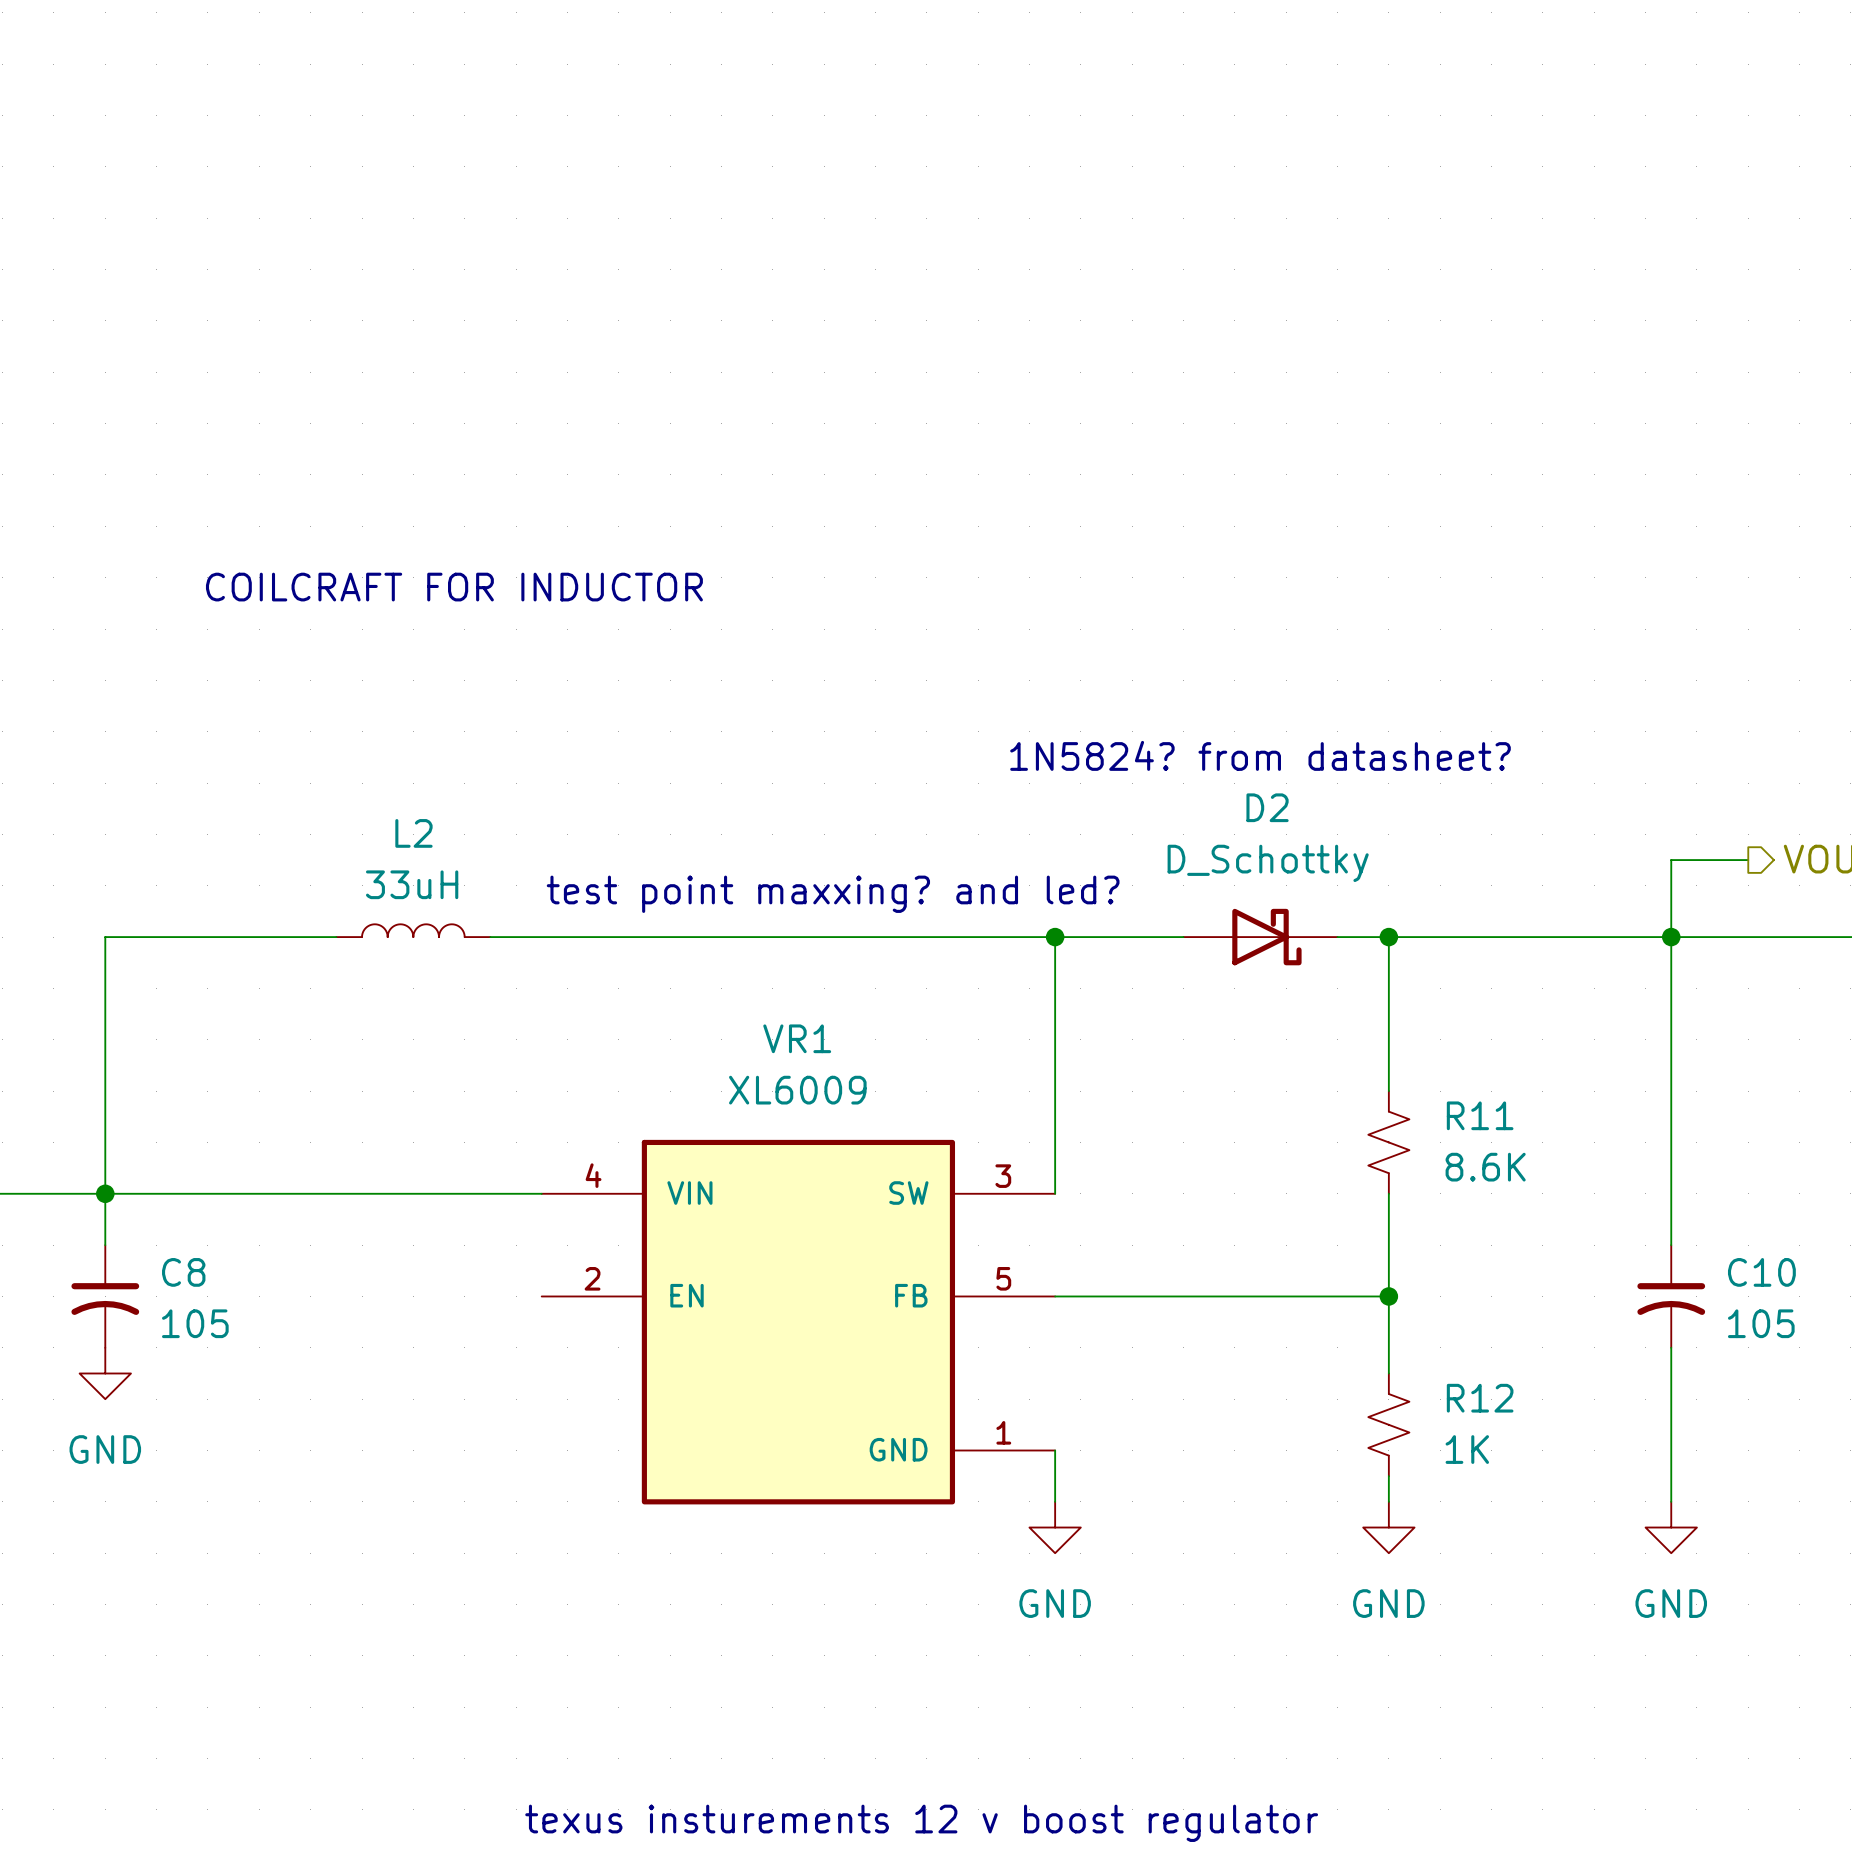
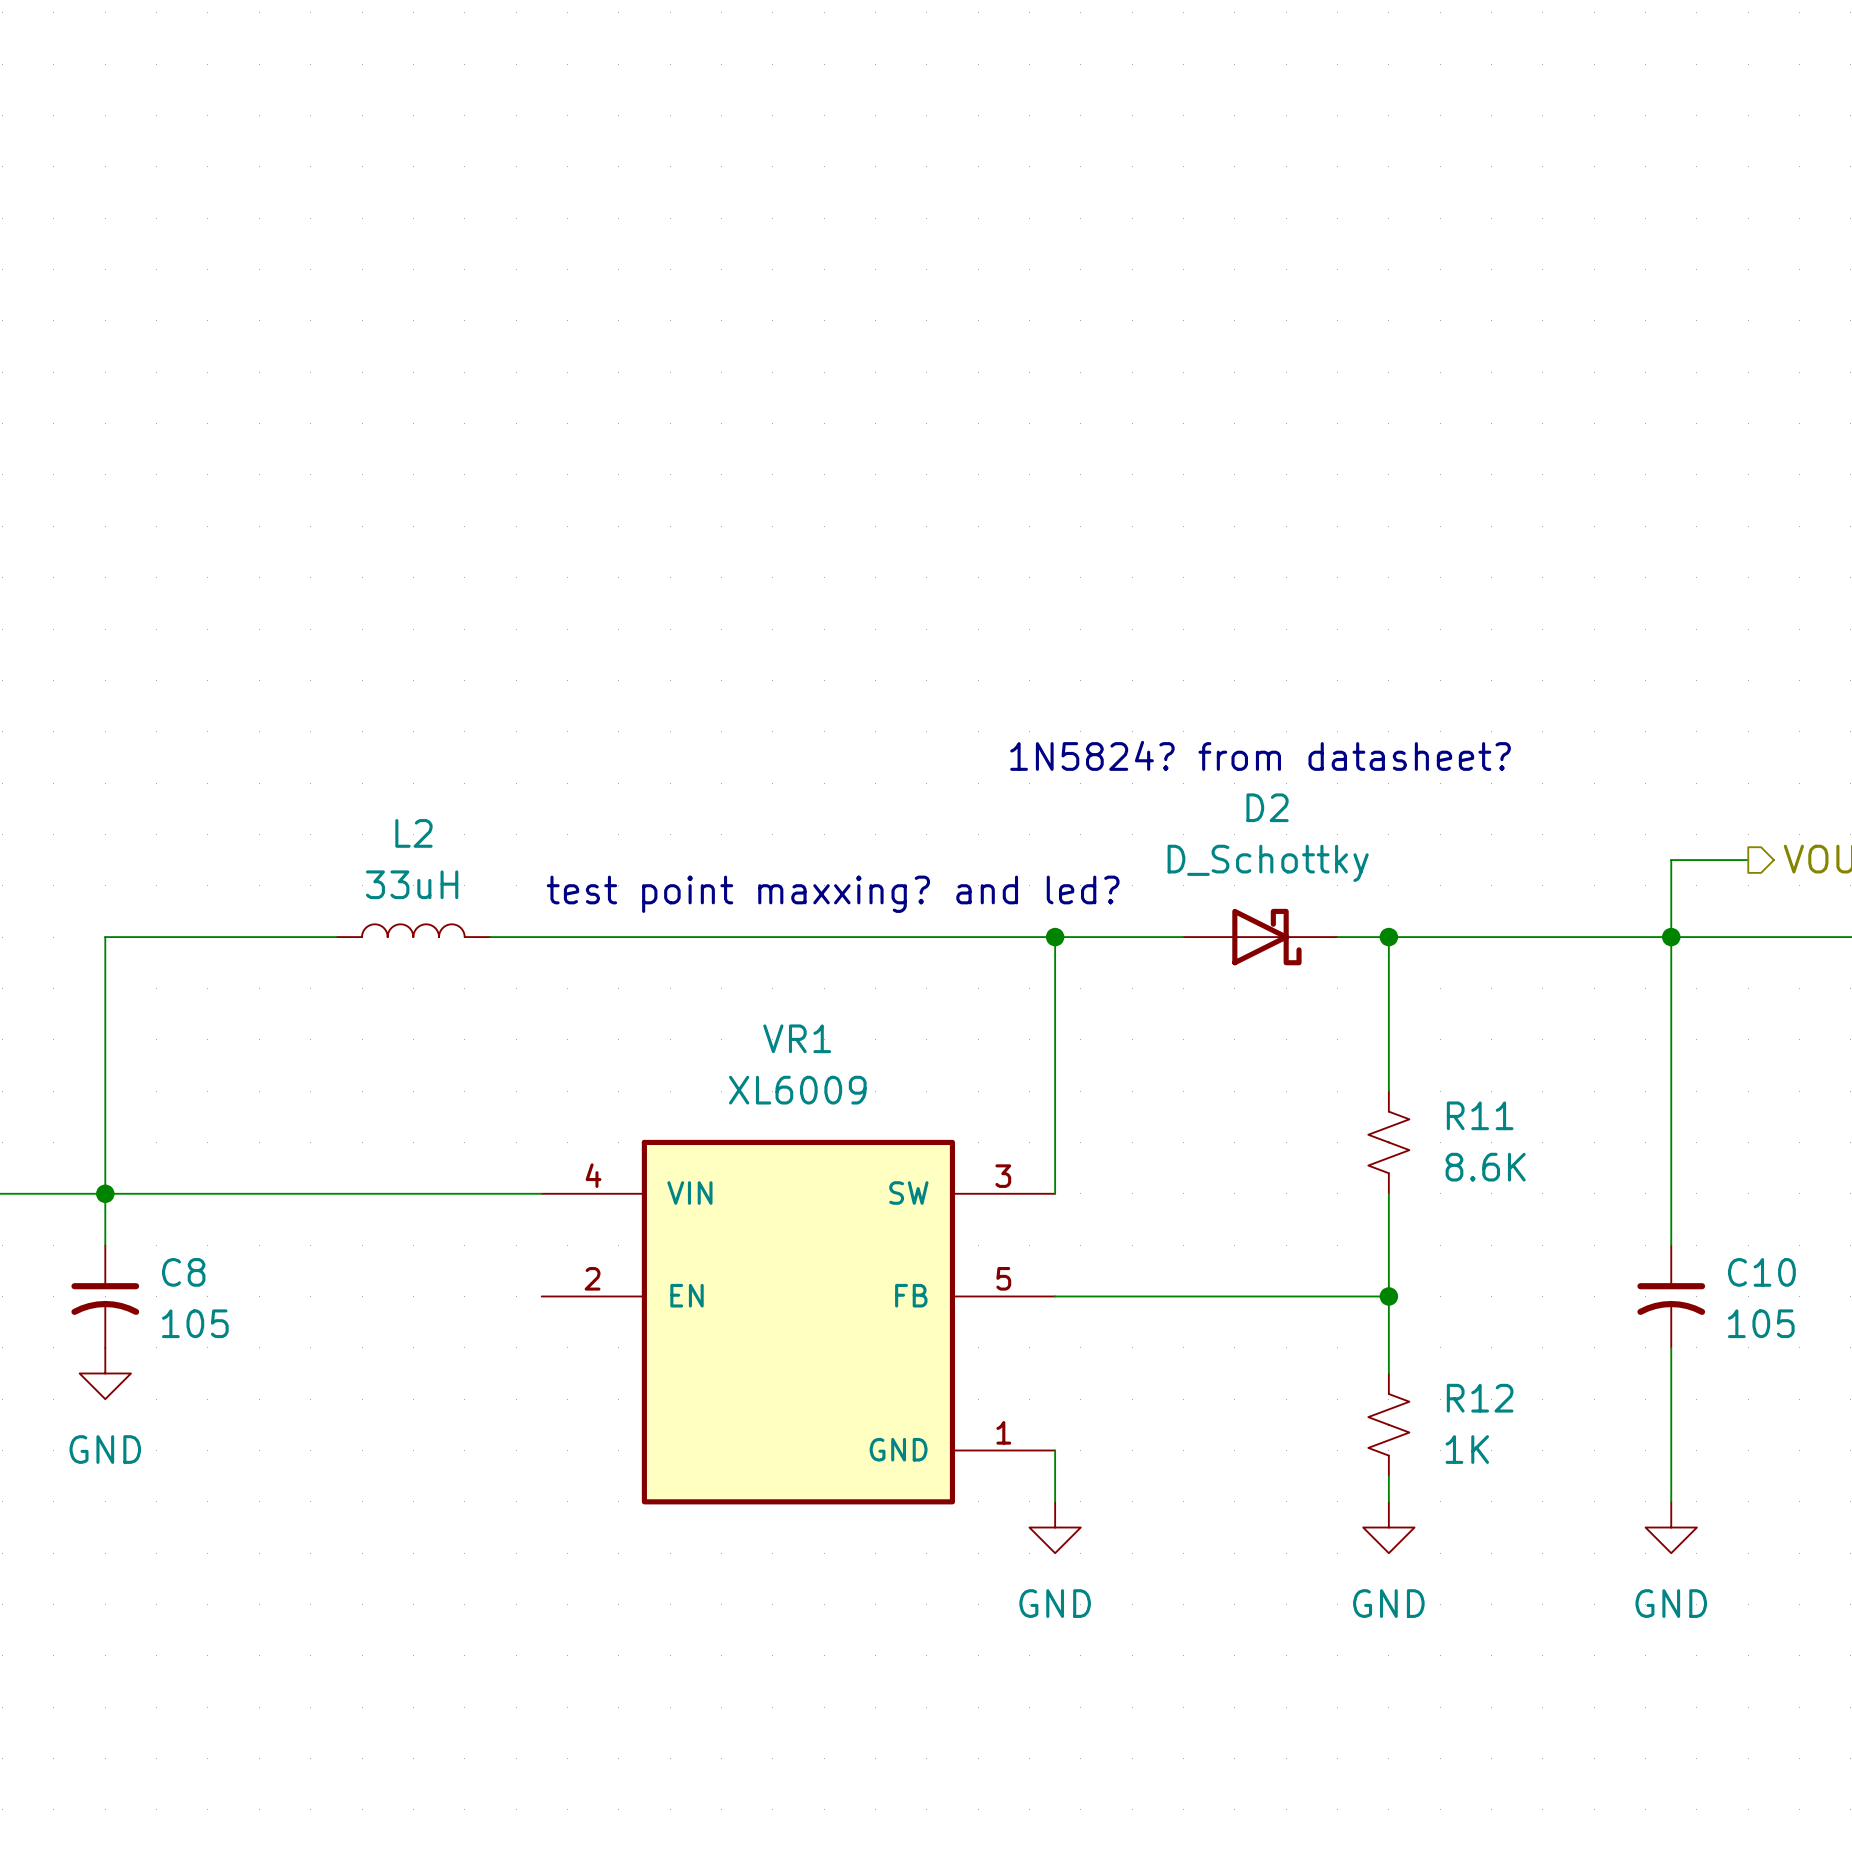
text: COILCRAFT FOR INDUCTOR (454, 587) -> none
text: texus insturements 12 v boost regulator (921, 1823) -> none

